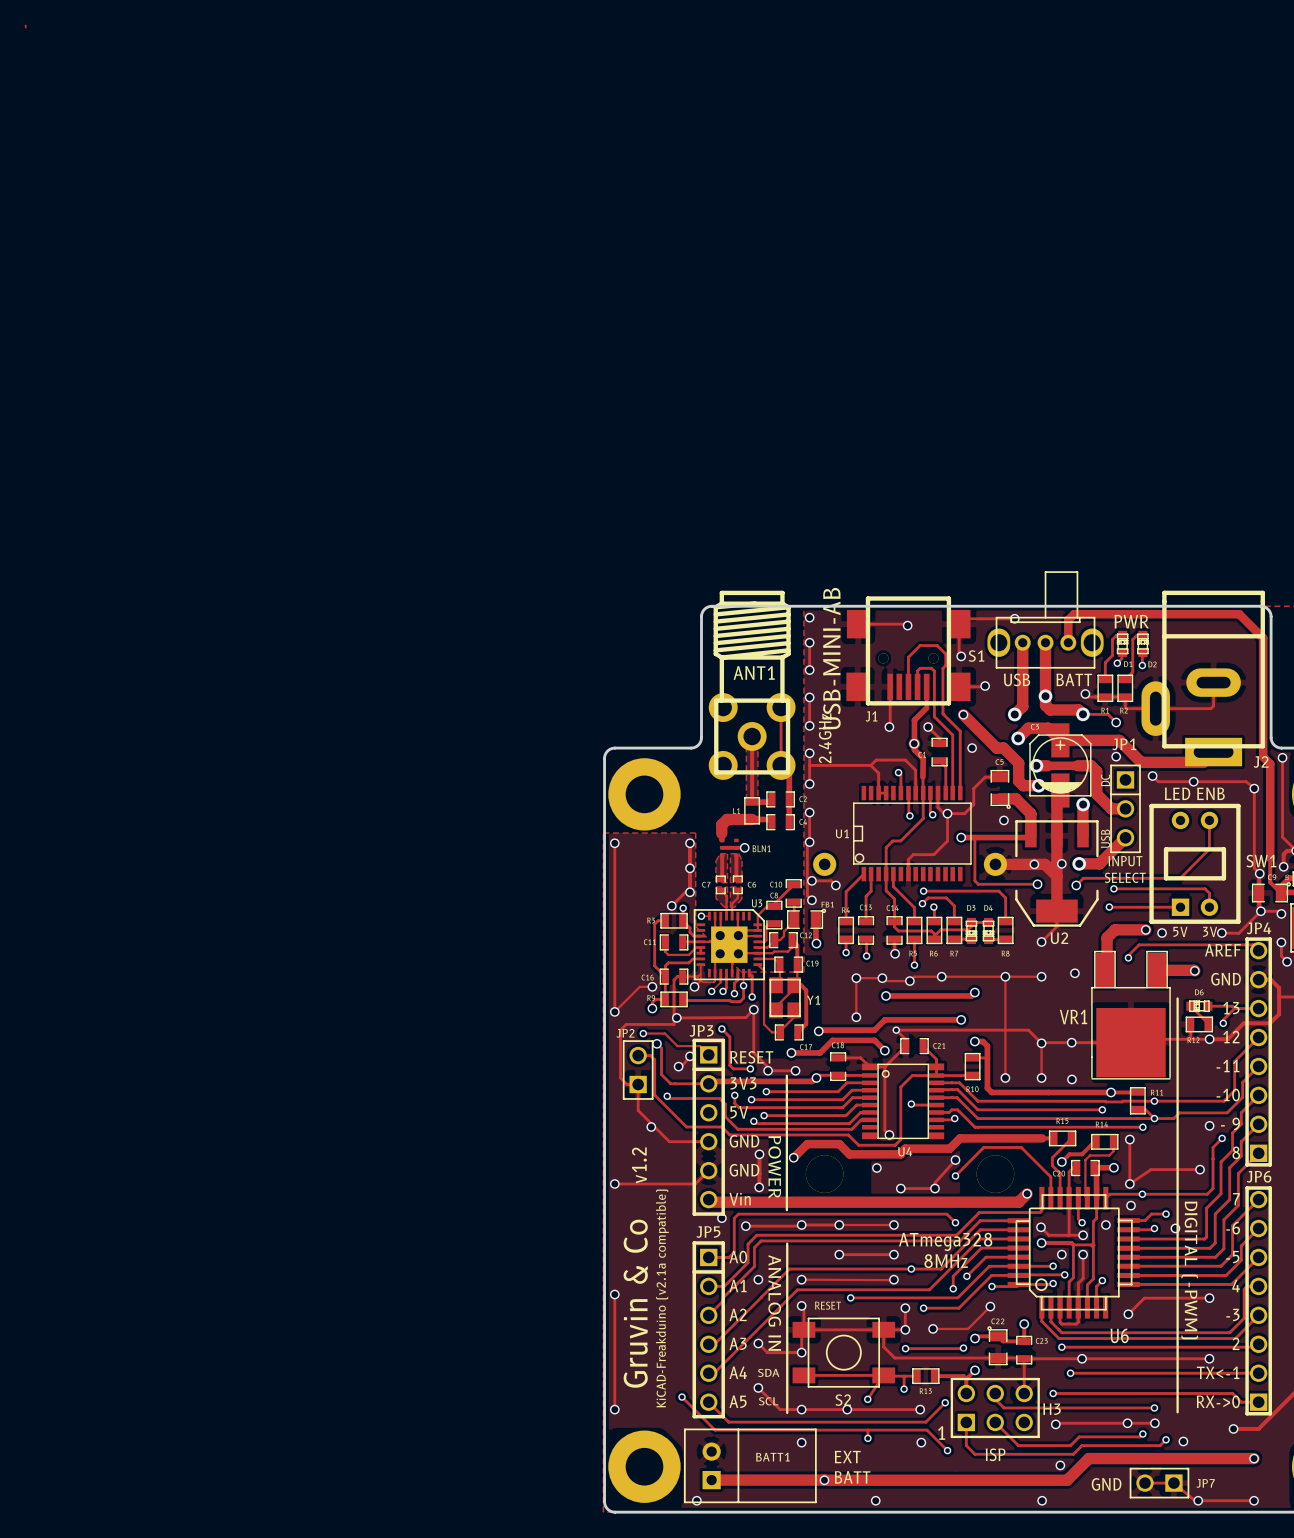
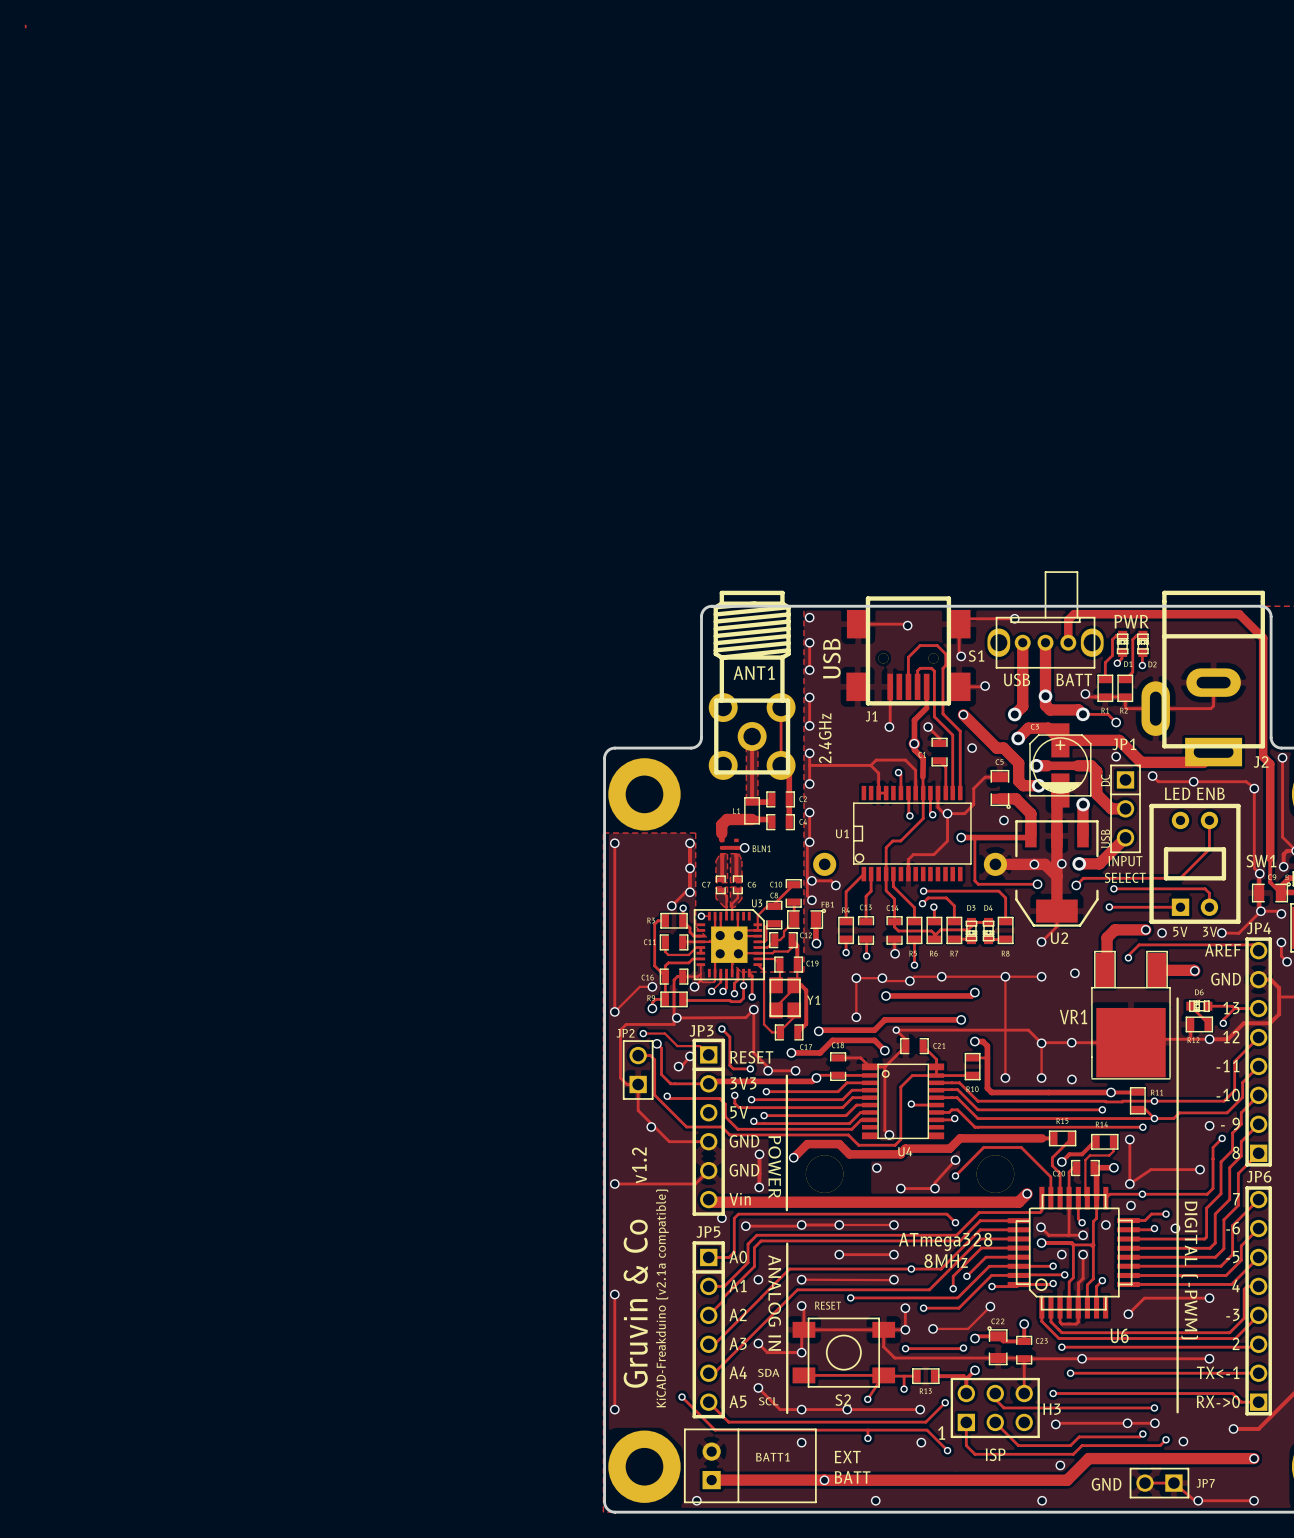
J1 value: USB-MINI-AB (831, 658) -> USB (831, 658)

